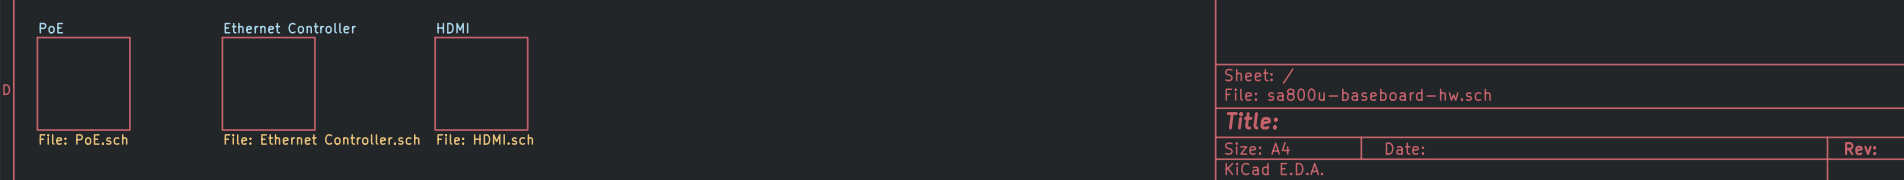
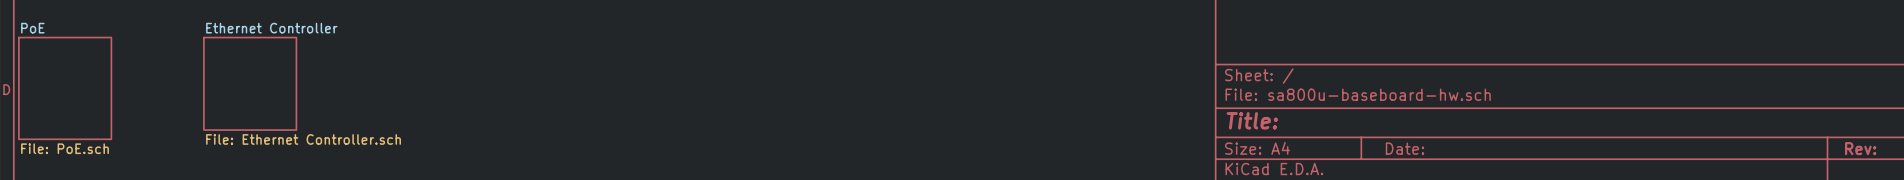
sheet PoE: File: PoE.sch (83, 83) -> none
sheet Ethernet Controller position: (268, 83) -> (250, 83)
sheet HDMI: File: HDMI.sch (481, 83) -> none
sheet PoE: none -> File: PoE.sch (65, 88)

